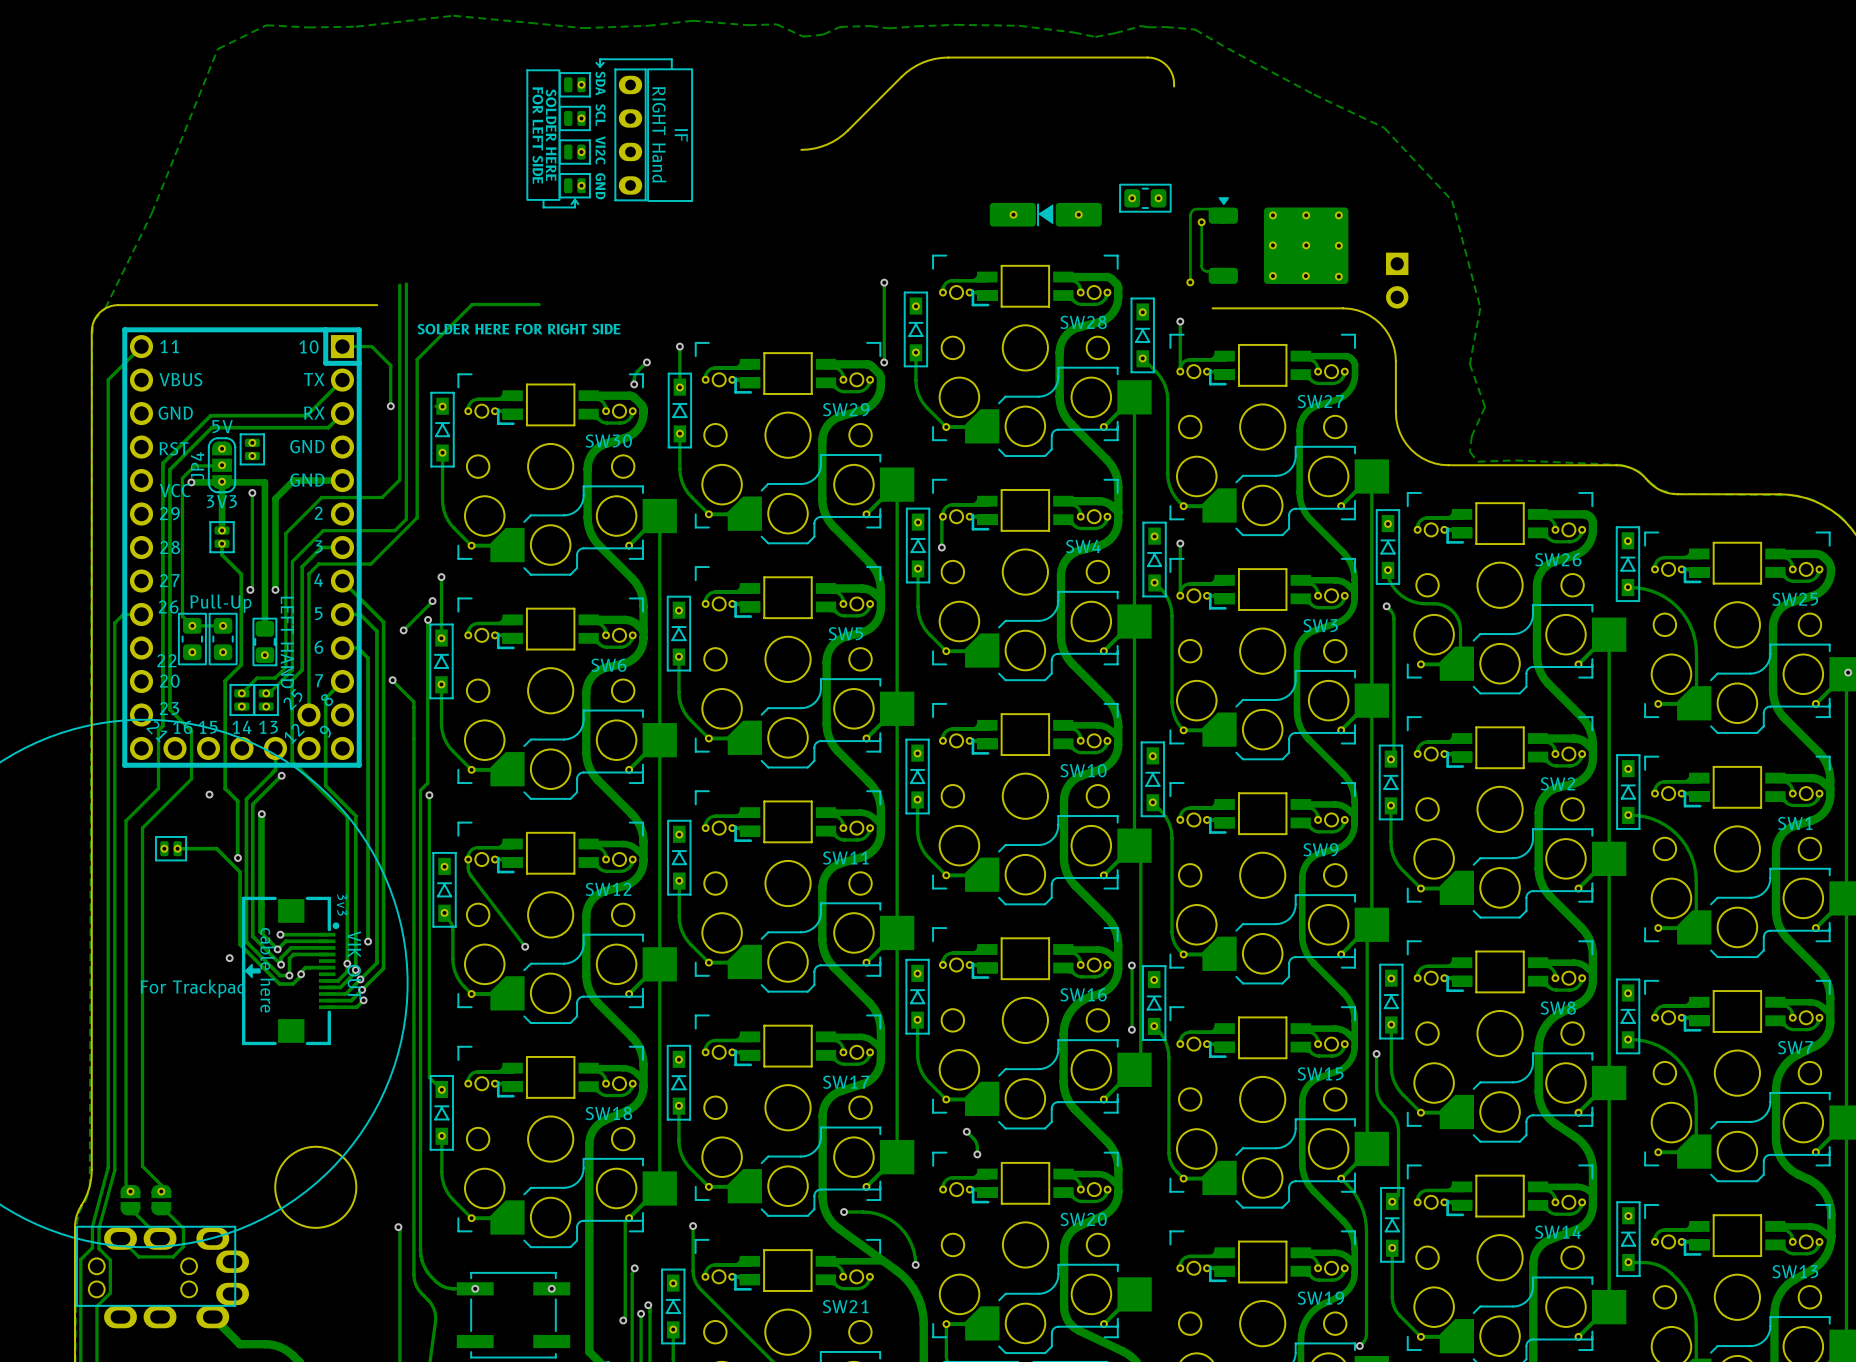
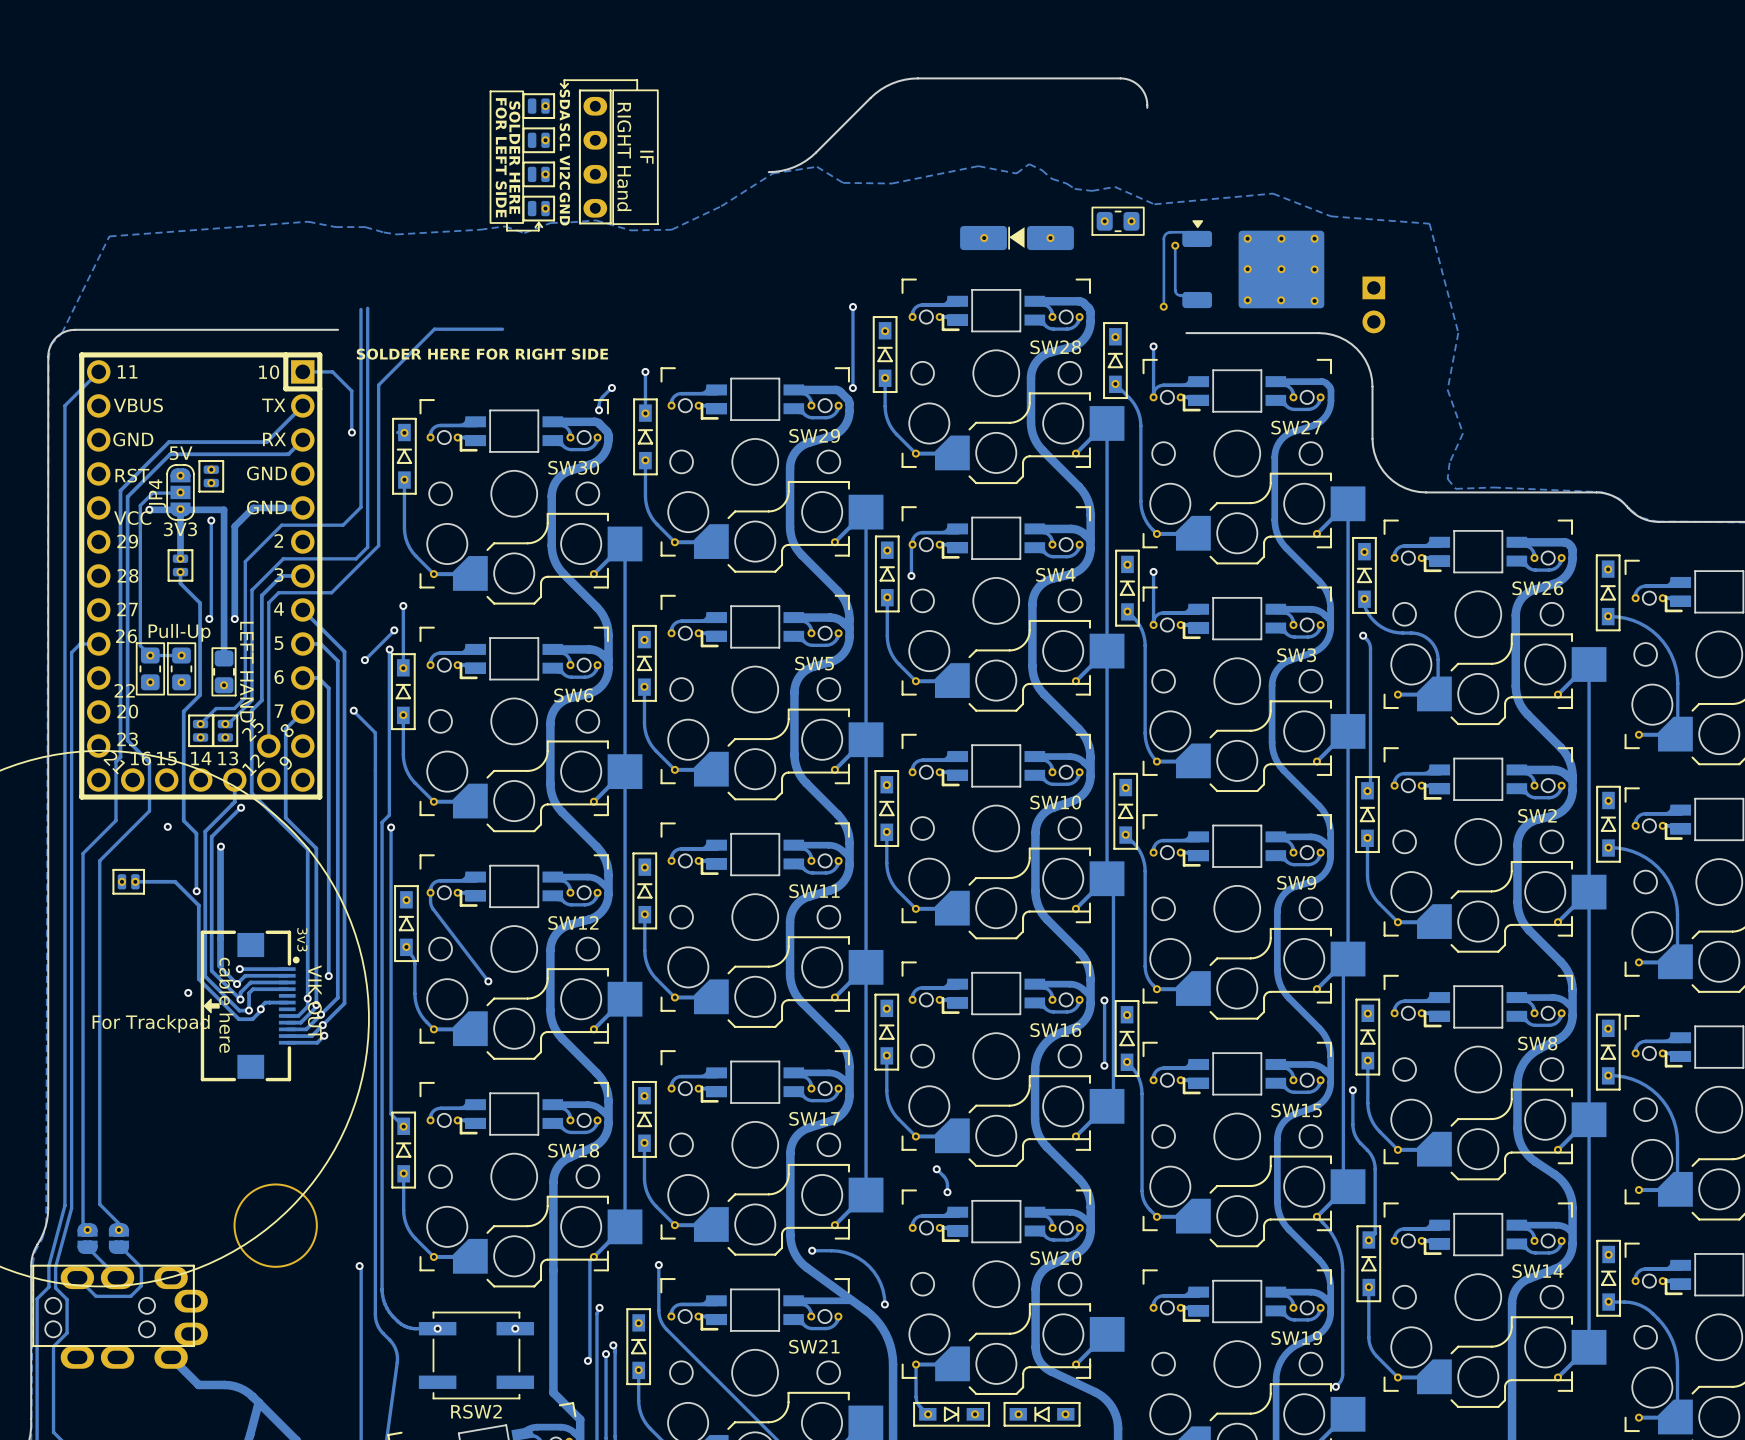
zone outline: (1452, 200) (1384, 127) (1313, 94) (1195, 29) (1141, 26) (1095, 36) (1019, 25) (956, 24) (889, 28) (870, 26) (840, 26) (823, 34) (803, 36) (776, 24) (748, 25) (692, 20) (647, 25) (583, 28) (453, 15) (356, 26) (308, 27) (266, 25) (217, 49) (151, 213) -> (1429, 223) (1331, 216) (1272, 193) (1154, 204) (1114, 186) (1092, 190) (1074, 188) (1066, 183) (1051, 178) (1041, 170) (1029, 164) (1016, 173) (978, 166) (891, 183) (843, 182) (816, 166) (772, 173) (721, 206) (671, 229) (630, 230) (596, 220) (550, 223) (524, 233) (505, 226) (480, 229) (396, 234) (365, 227) (335, 227) (308, 221) (109, 236)

